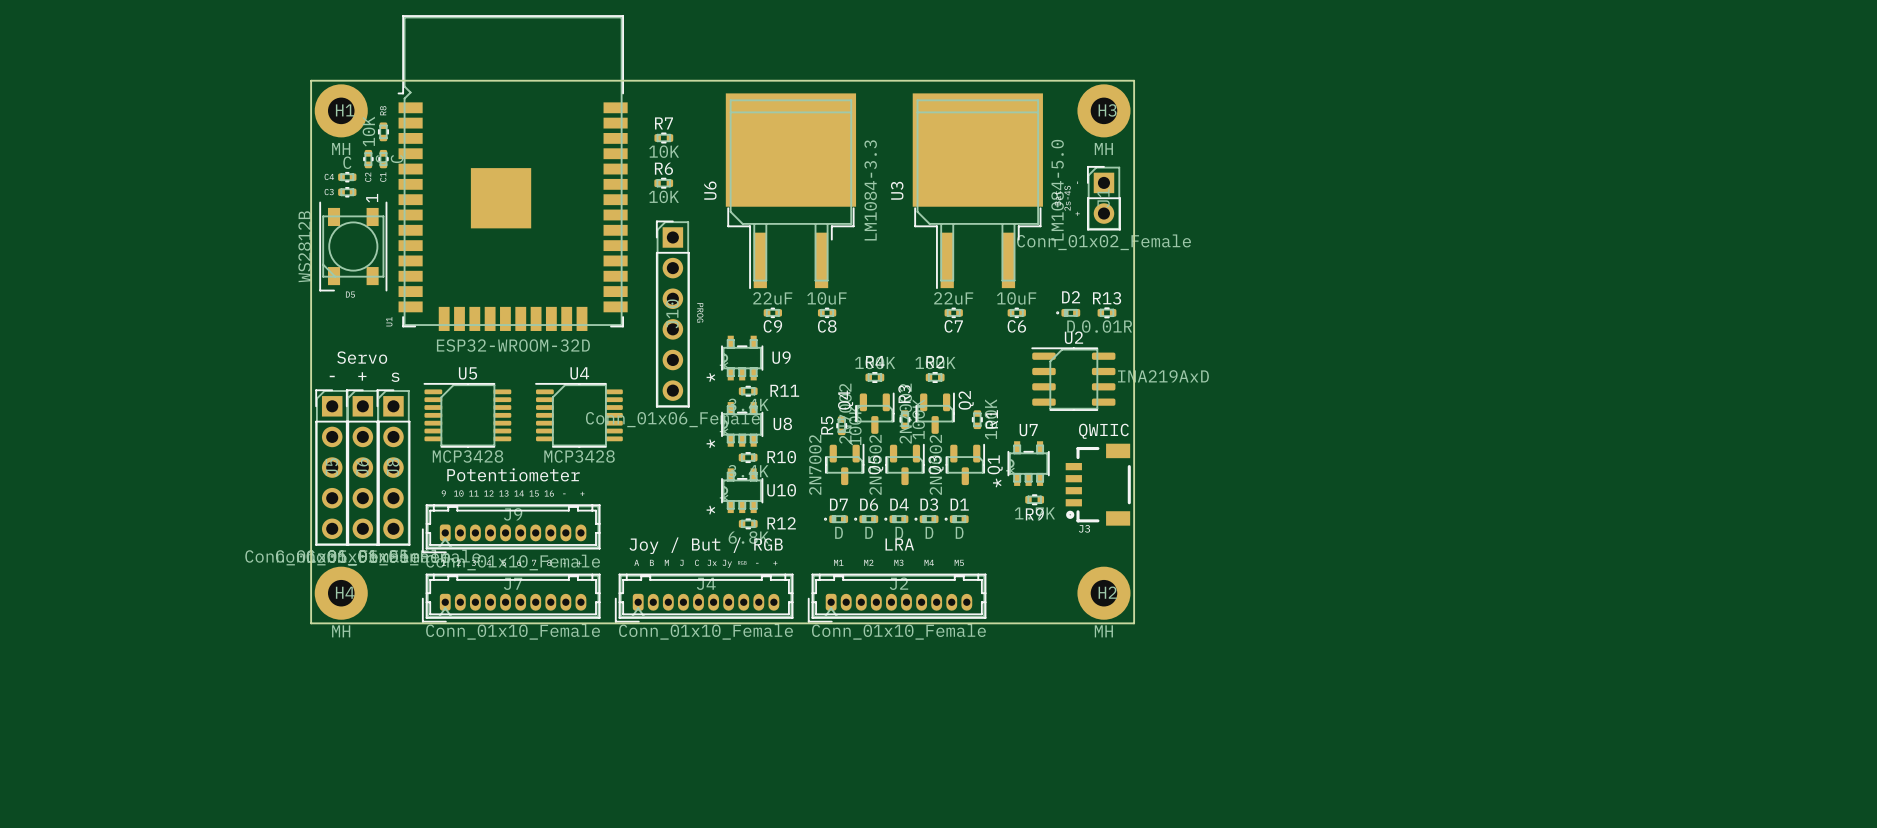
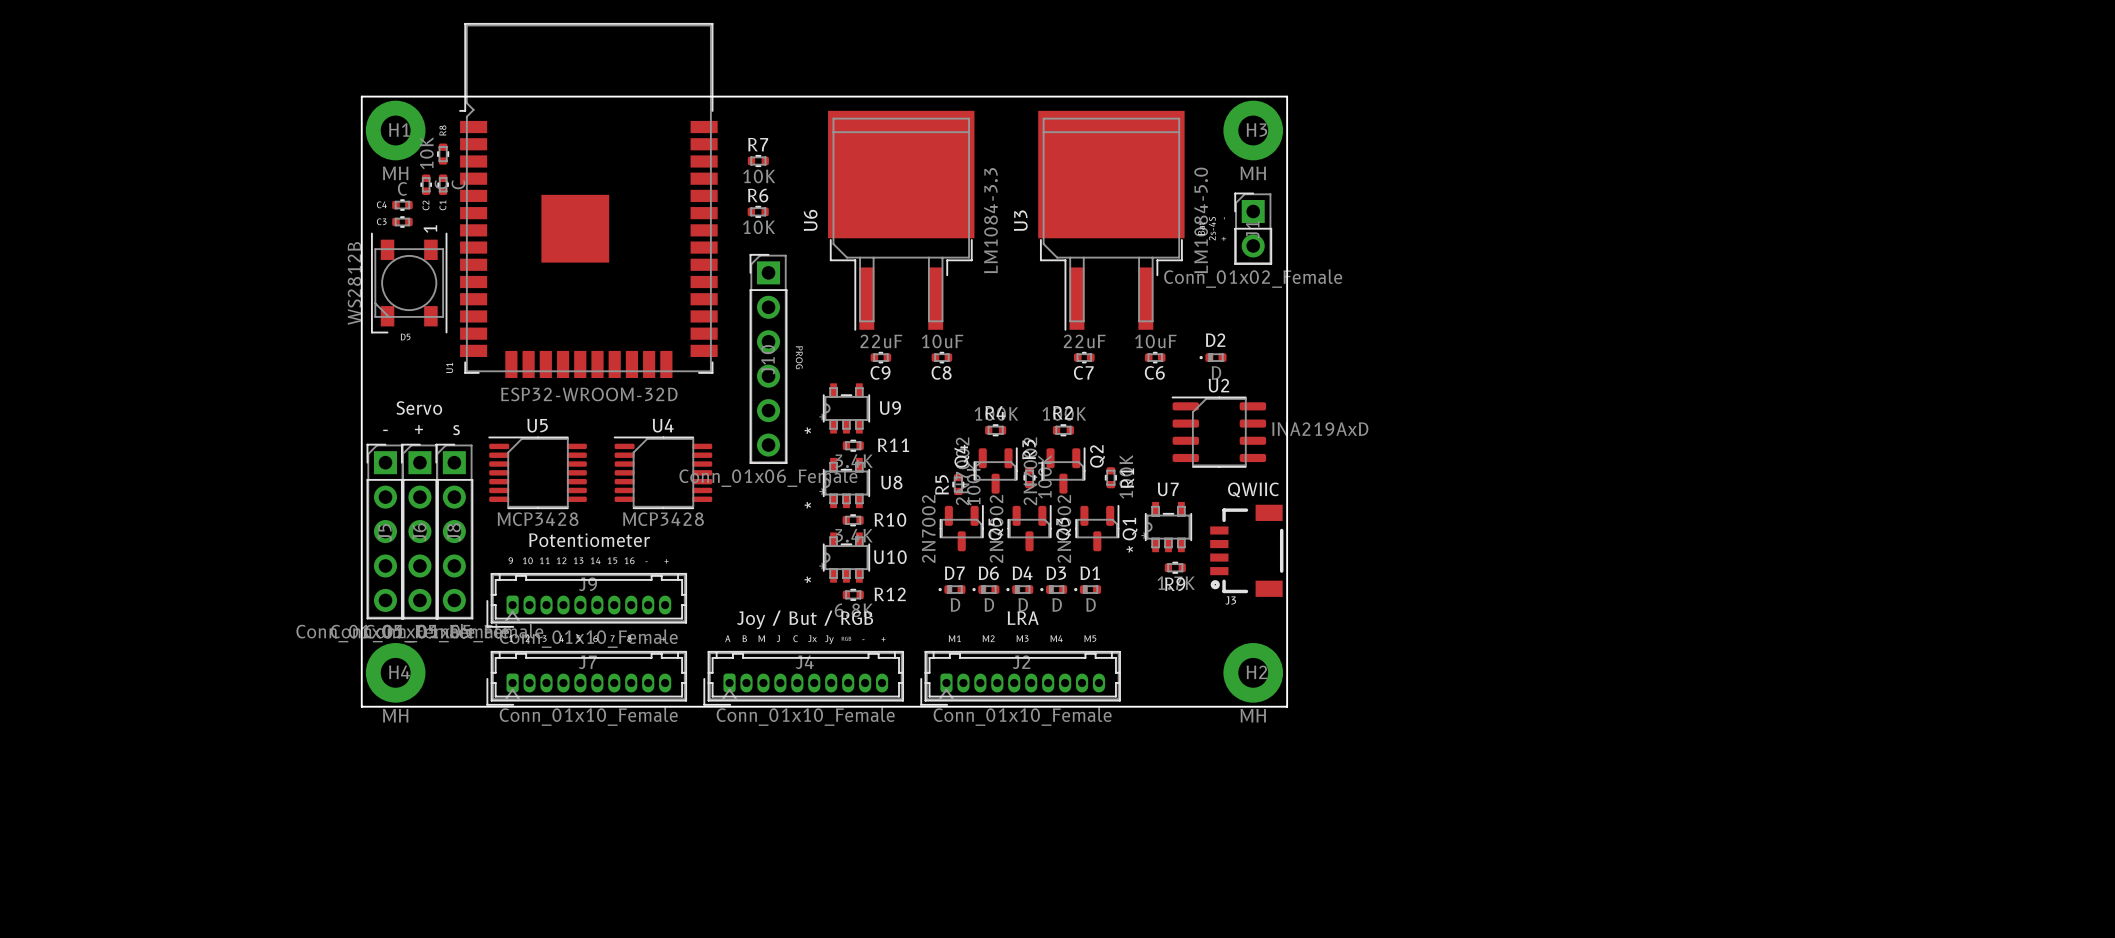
R13: 0.01R (1106, 312) -> none

